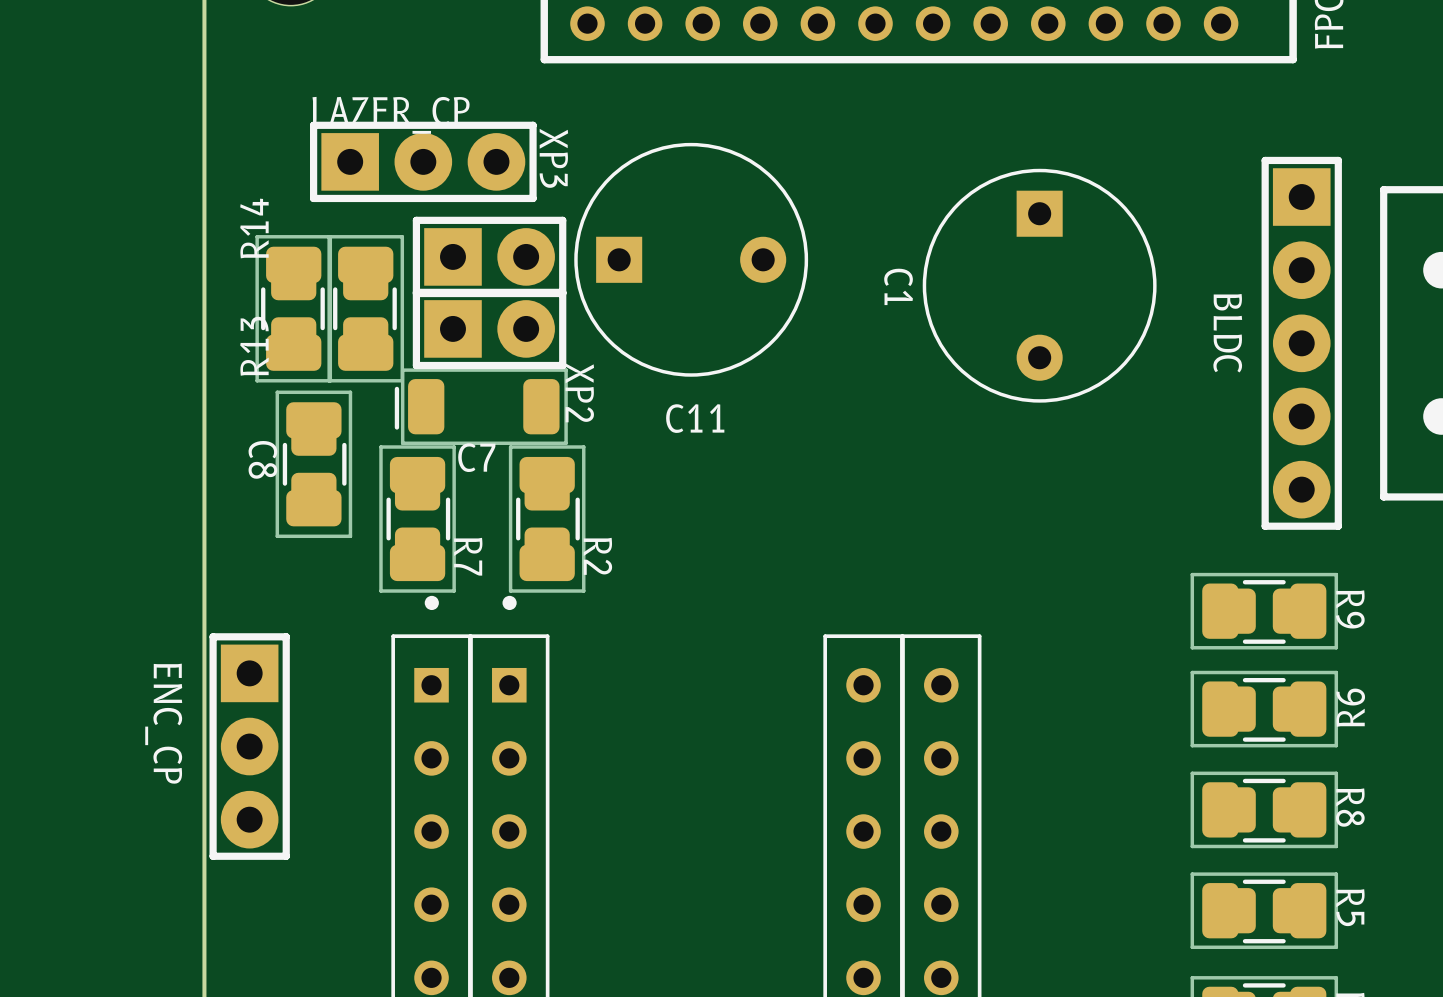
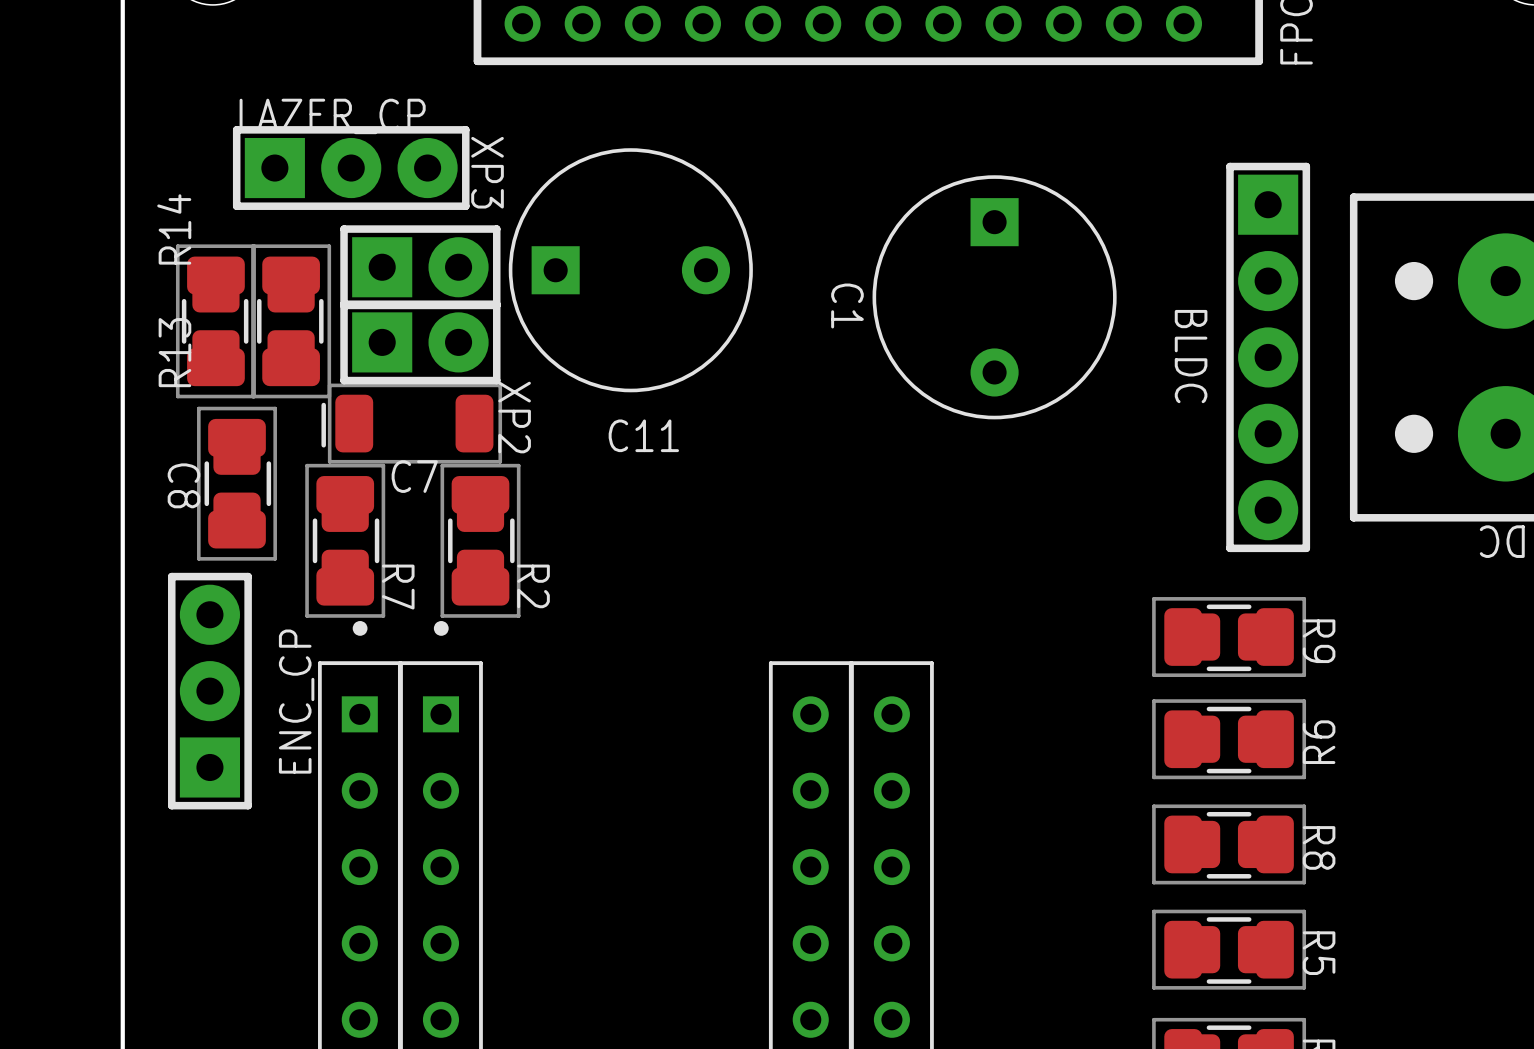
text rotation: 0° (163, 723) -> 180° (296, 701)
text position: ENC_CP (163, 723) -> ENC_CP (296, 701)
part rotation: 0° (249, 746) -> 180° (209, 691)

